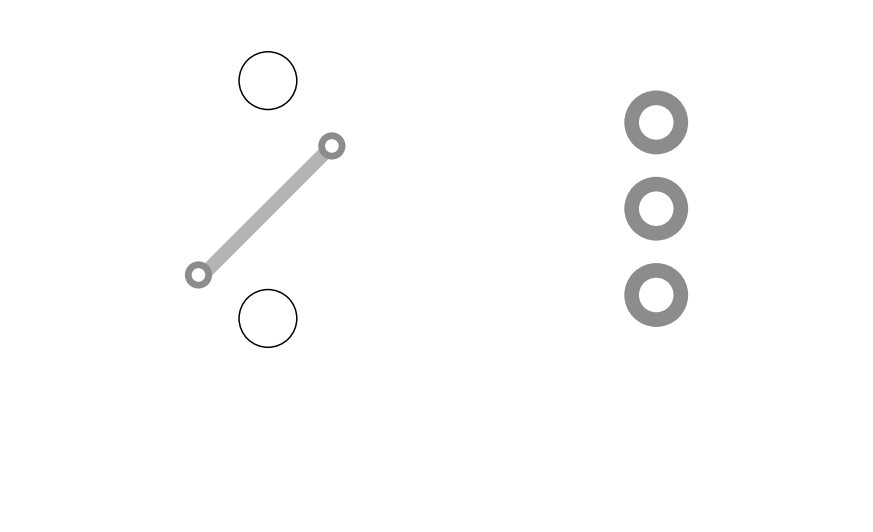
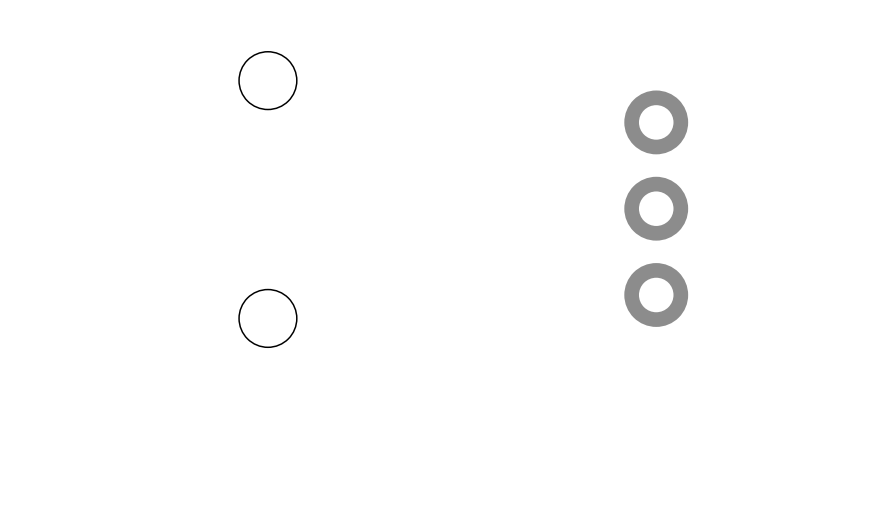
track: (331, 145) (202, 274) (198, 274) -> none
via: (331, 145) -> none
via: (198, 274) -> none

